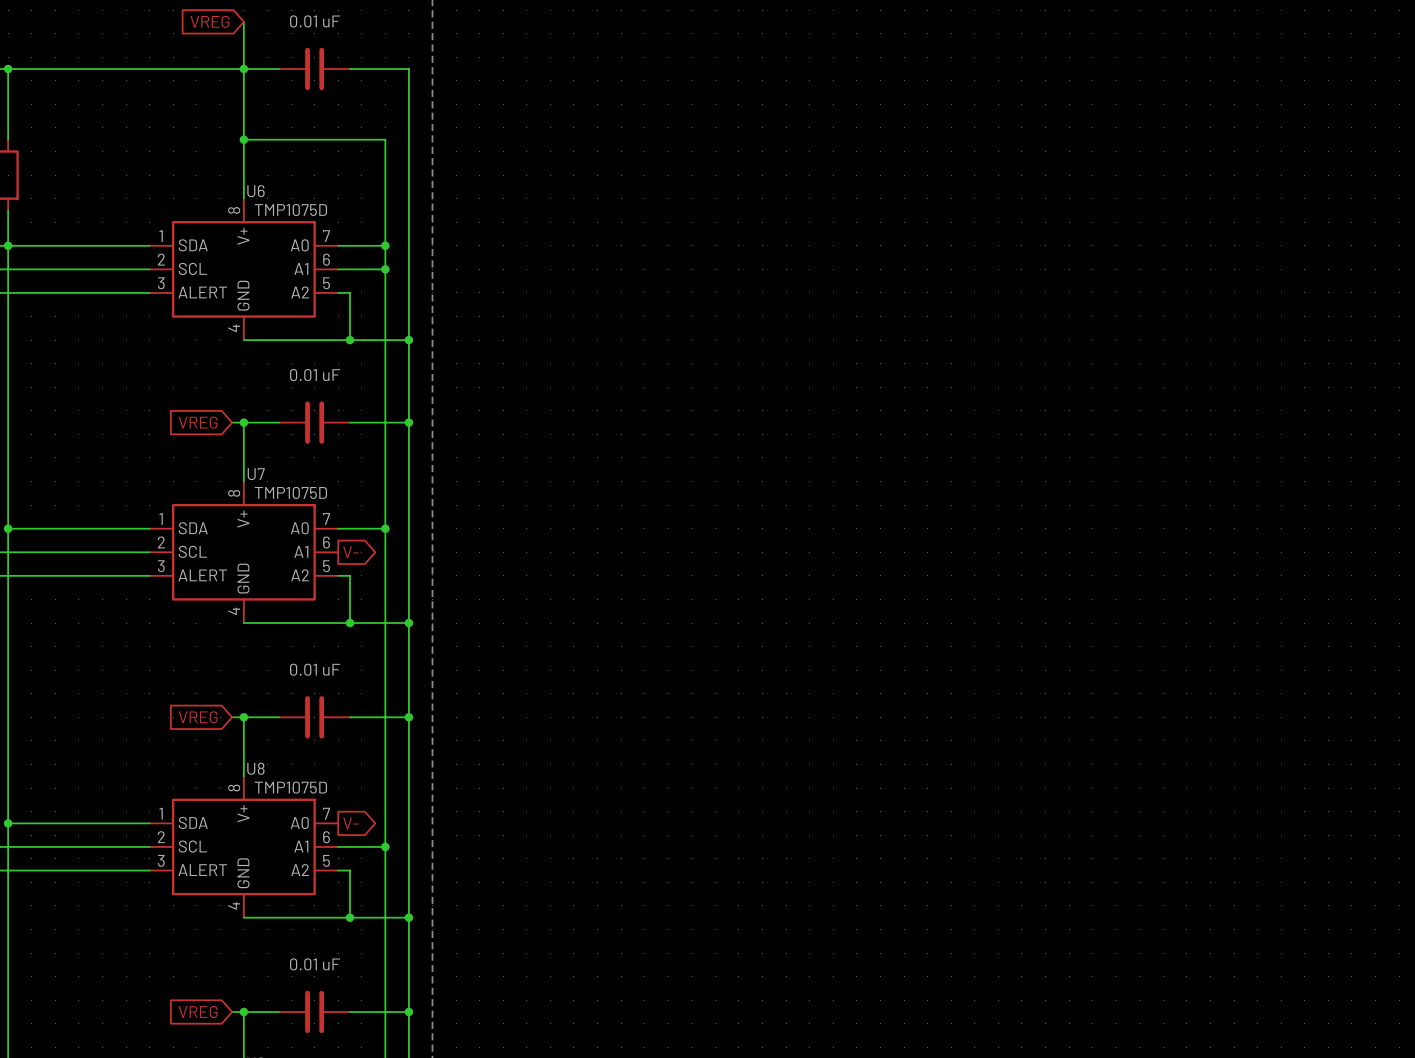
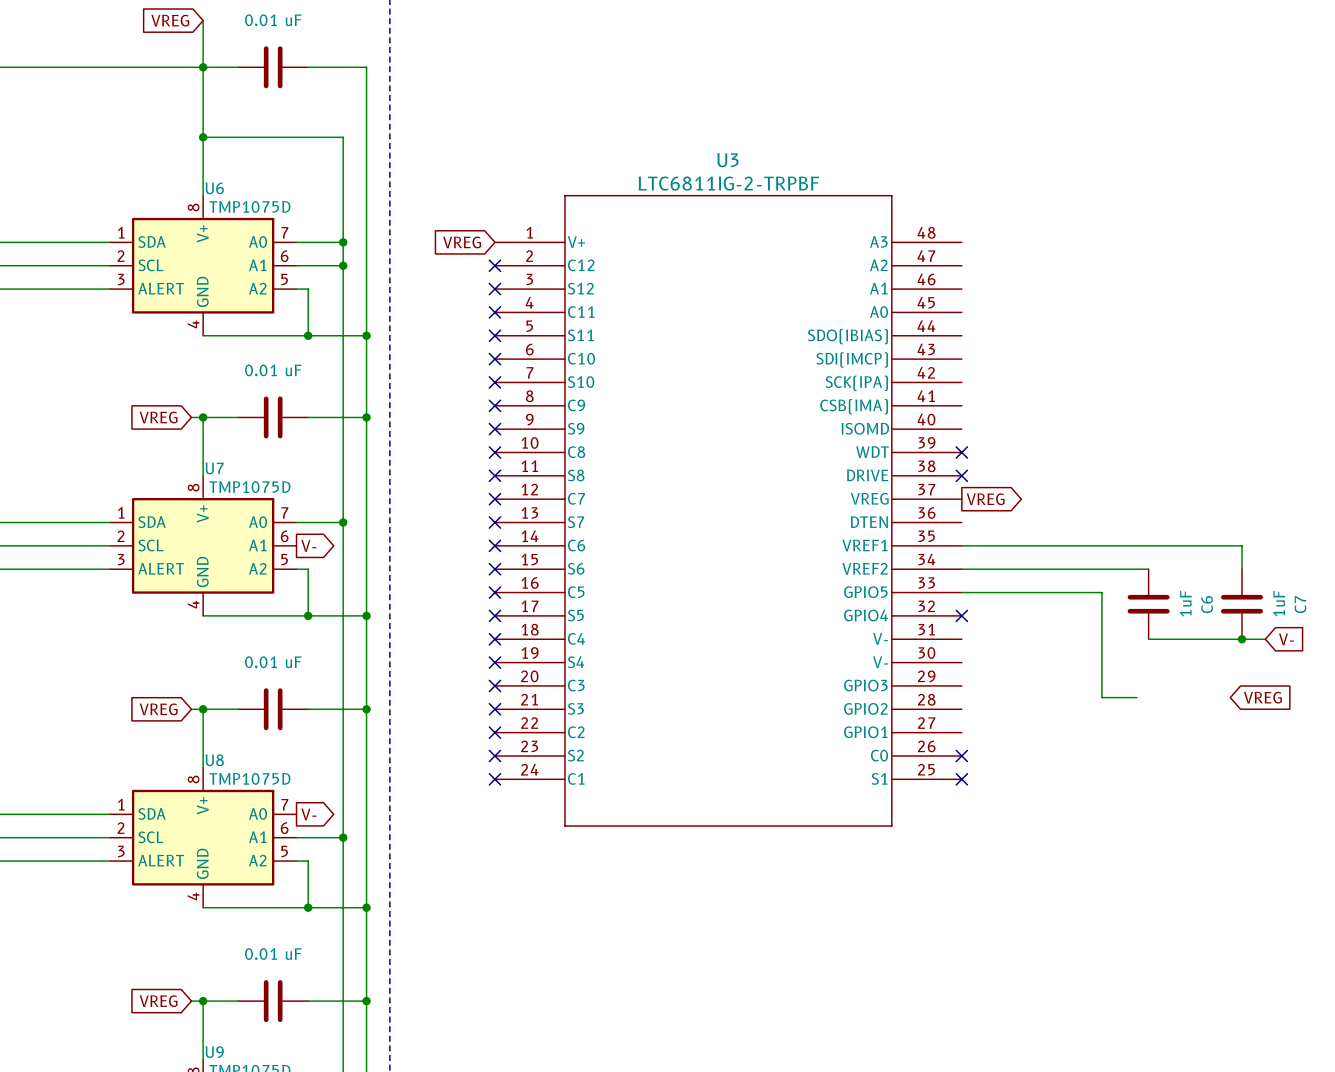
global label: none -> VREG (462, 242)
no-connect mark: none -> (494, 265)
no-connect mark: none -> (494, 289)
no-connect mark: none -> (494, 312)
no-connect mark: none -> (494, 335)
no-connect mark: none -> (494, 359)
no-connect mark: none -> (494, 382)
no-connect mark: none -> (494, 405)
no-connect mark: none -> (494, 429)
no-connect mark: none -> (494, 452)
no-connect mark: none -> (961, 452)
no-connect mark: none -> (494, 475)
no-connect mark: none -> (961, 475)
no-connect mark: none -> (494, 499)
global label: none -> VREG (985, 499)
U3: none -> LTC6811IG-2-TRPBF (728, 510)
no-connect mark: none -> (494, 522)
no-connect mark: none -> (494, 545)
wire: none -> (961, 545) (1241, 545) (1241, 569)
no-connect mark: none -> (494, 569)
wire: none -> (961, 569) (1148, 569)
no-connect mark: none -> (494, 592)
wire: none -> (961, 592) (1101, 592) (1101, 697) (1136, 697)
C6: none -> 1uF (1148, 604)
C7: none -> 1uF (1241, 604)
no-connect mark: none -> (494, 615)
no-connect mark: none -> (961, 615)
no-connect mark: none -> (494, 639)
wire: none -> (1148, 639) (1265, 639)
junction: none -> (1241, 639)
global label: none -> V- (1286, 639)
no-connect mark: none -> (494, 662)
no-connect mark: none -> (494, 685)
global label: none -> VREG (1262, 697)
no-connect mark: none -> (494, 709)
no-connect mark: none -> (494, 732)
no-connect mark: none -> (494, 755)
no-connect mark: none -> (961, 755)
no-connect mark: none -> (494, 779)
no-connect mark: none -> (961, 779)

